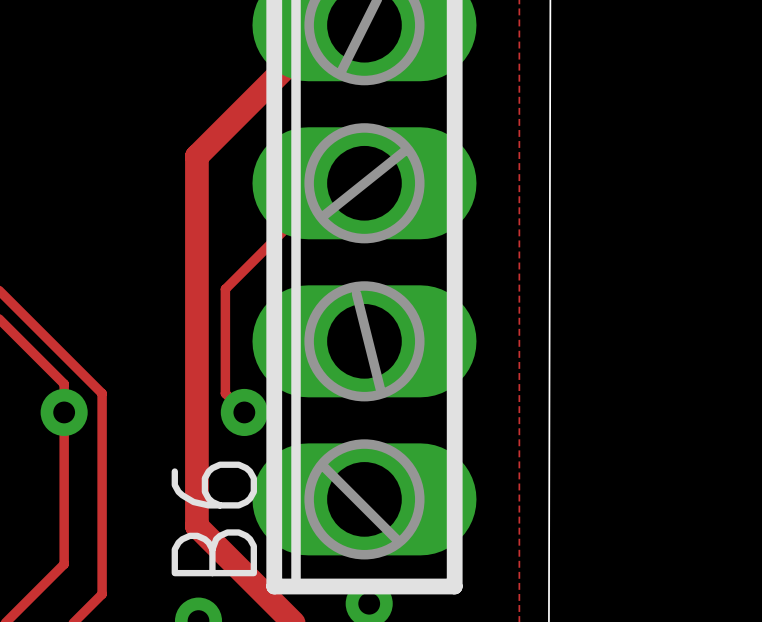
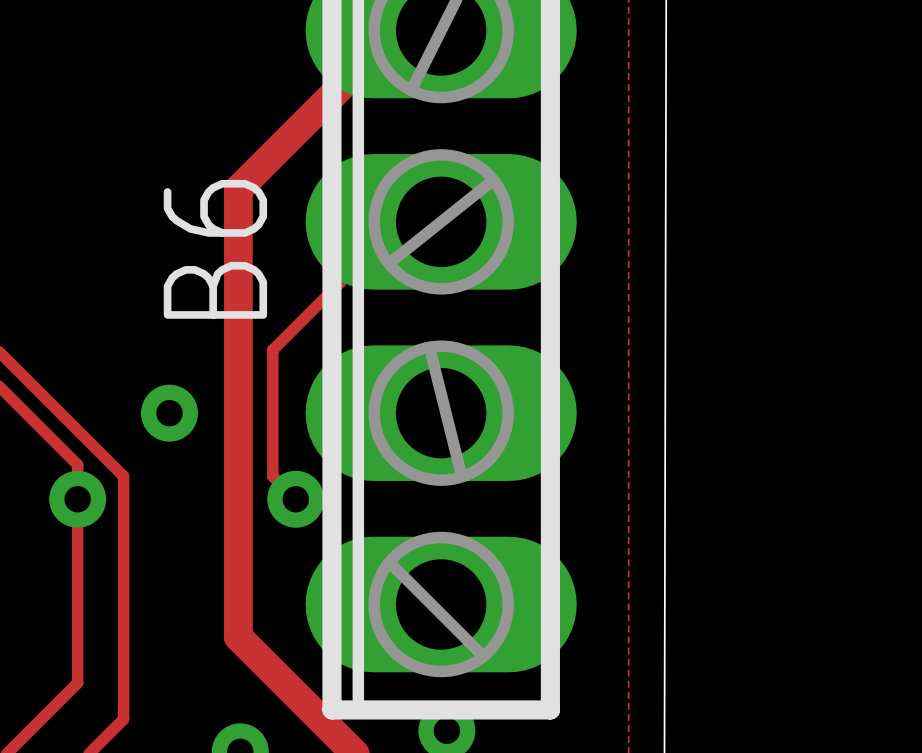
via: none -> (169, 413)
B6 name position: B6 (214, 518) -> B6 (215, 249)

